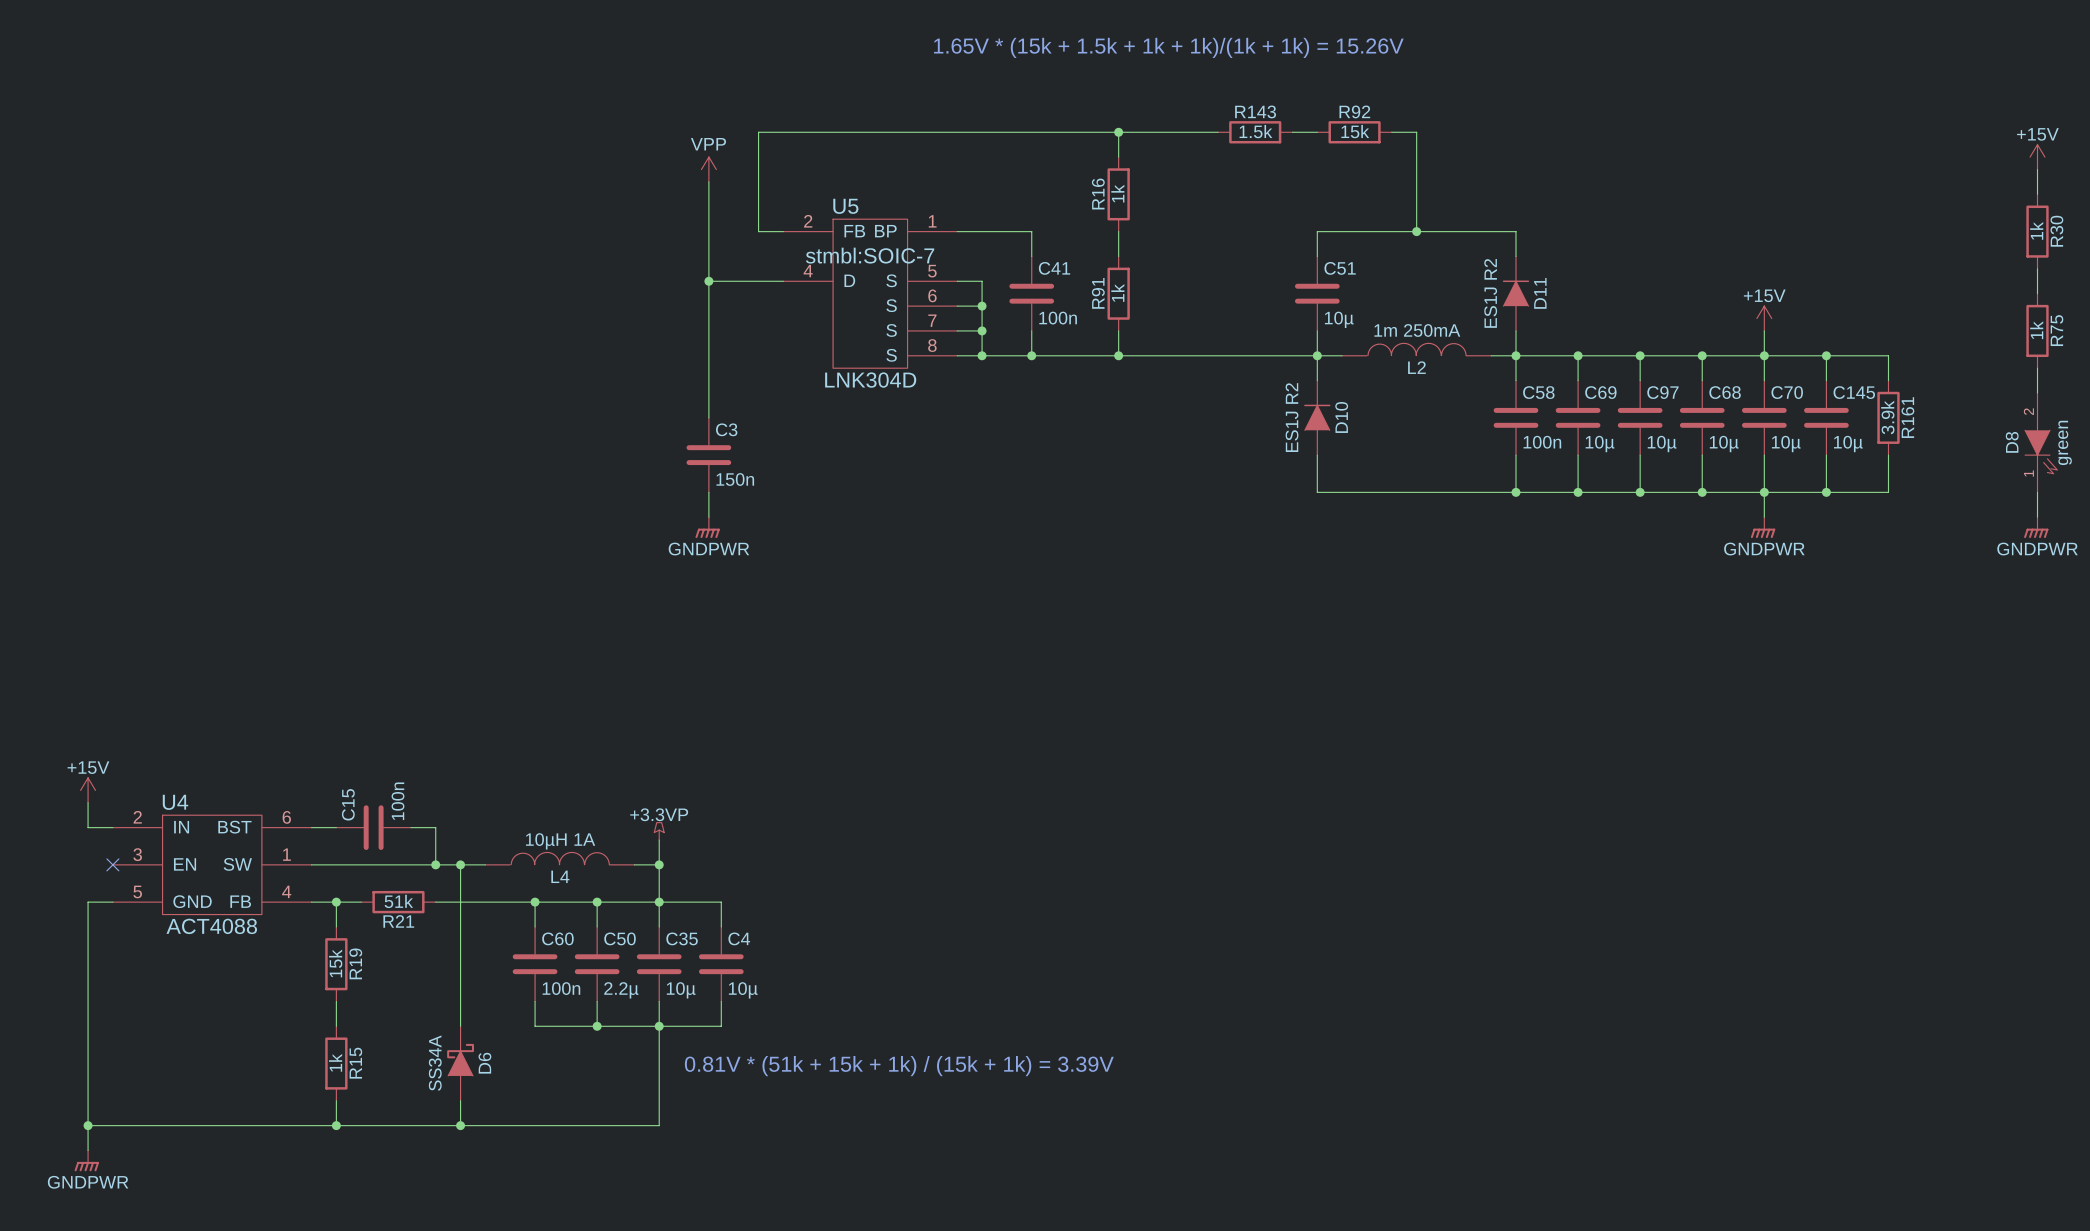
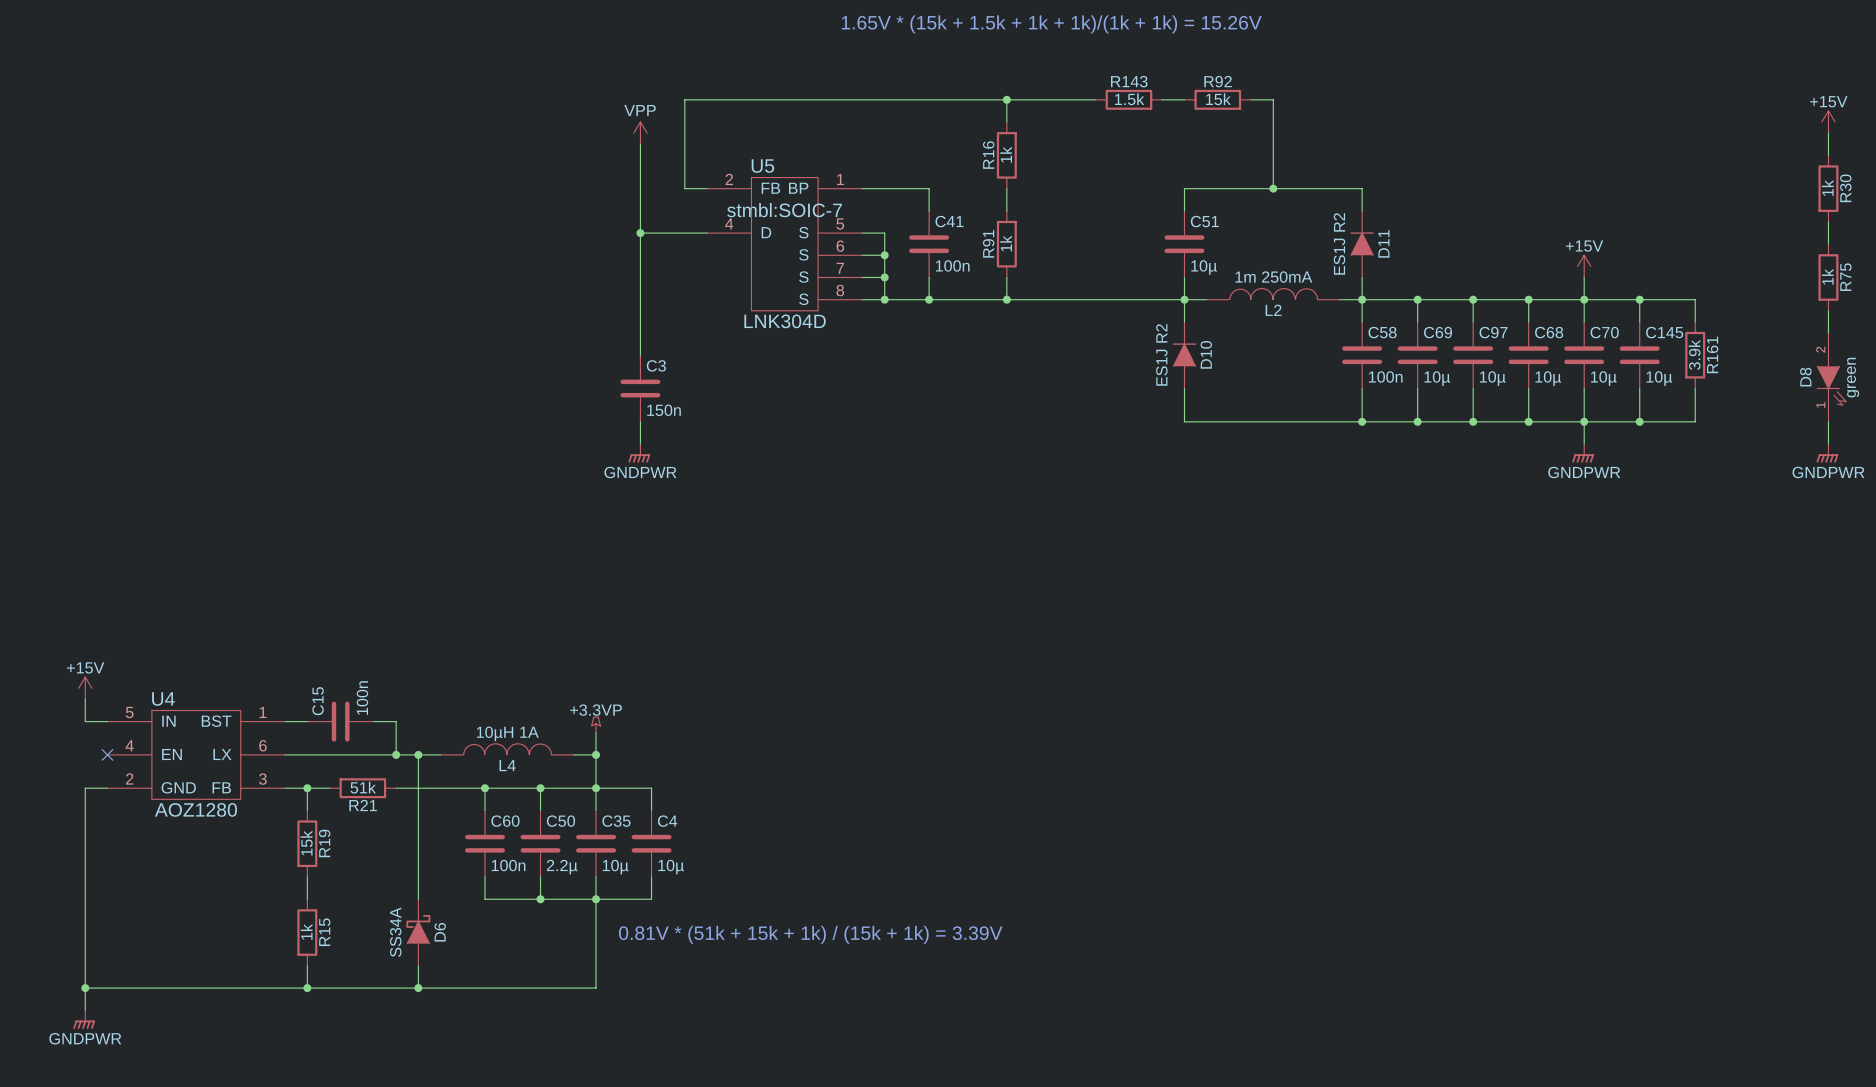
U4 pin number: 2 (137, 817) -> 5 (129, 712)
U4 pin number: 6 (286, 817) -> 1 (263, 712)
U4 pin number: 3 (137, 854) -> 4 (129, 745)
U4 pin number: 1 (286, 854) -> 6 (262, 745)
U4 pin name: SW (237, 864) -> LX (222, 754)
U4 pin number: 5 (137, 891) -> 2 (129, 778)
U4 pin number: 4 (286, 891) -> 3 (262, 779)
U4 value: ACT4088 (211, 926) -> AOZ1280 (195, 809)

